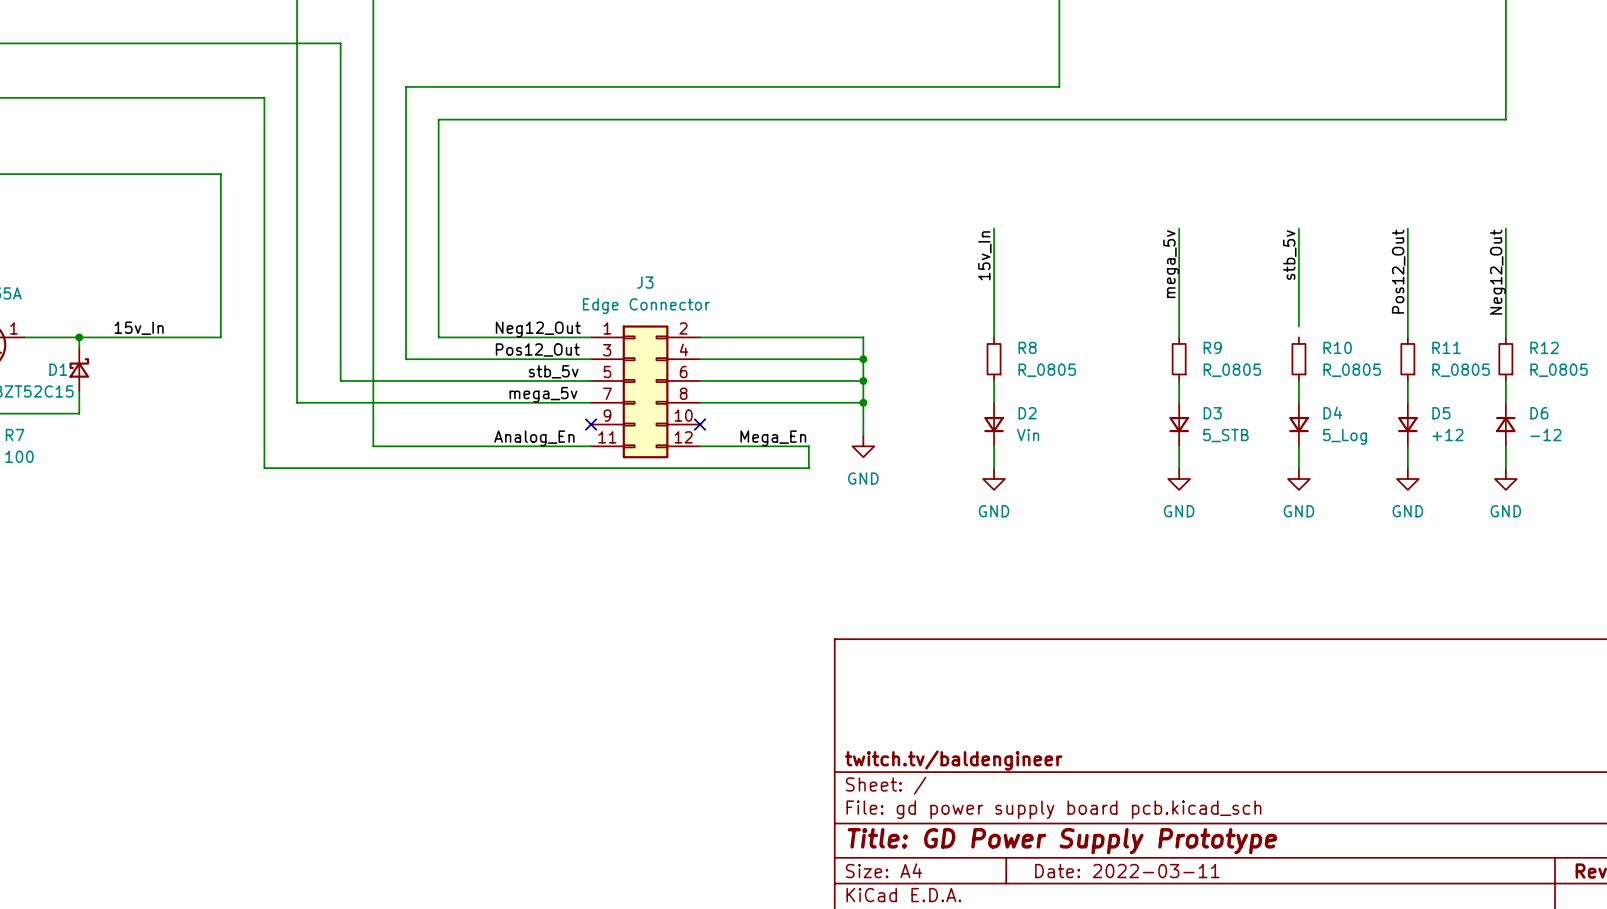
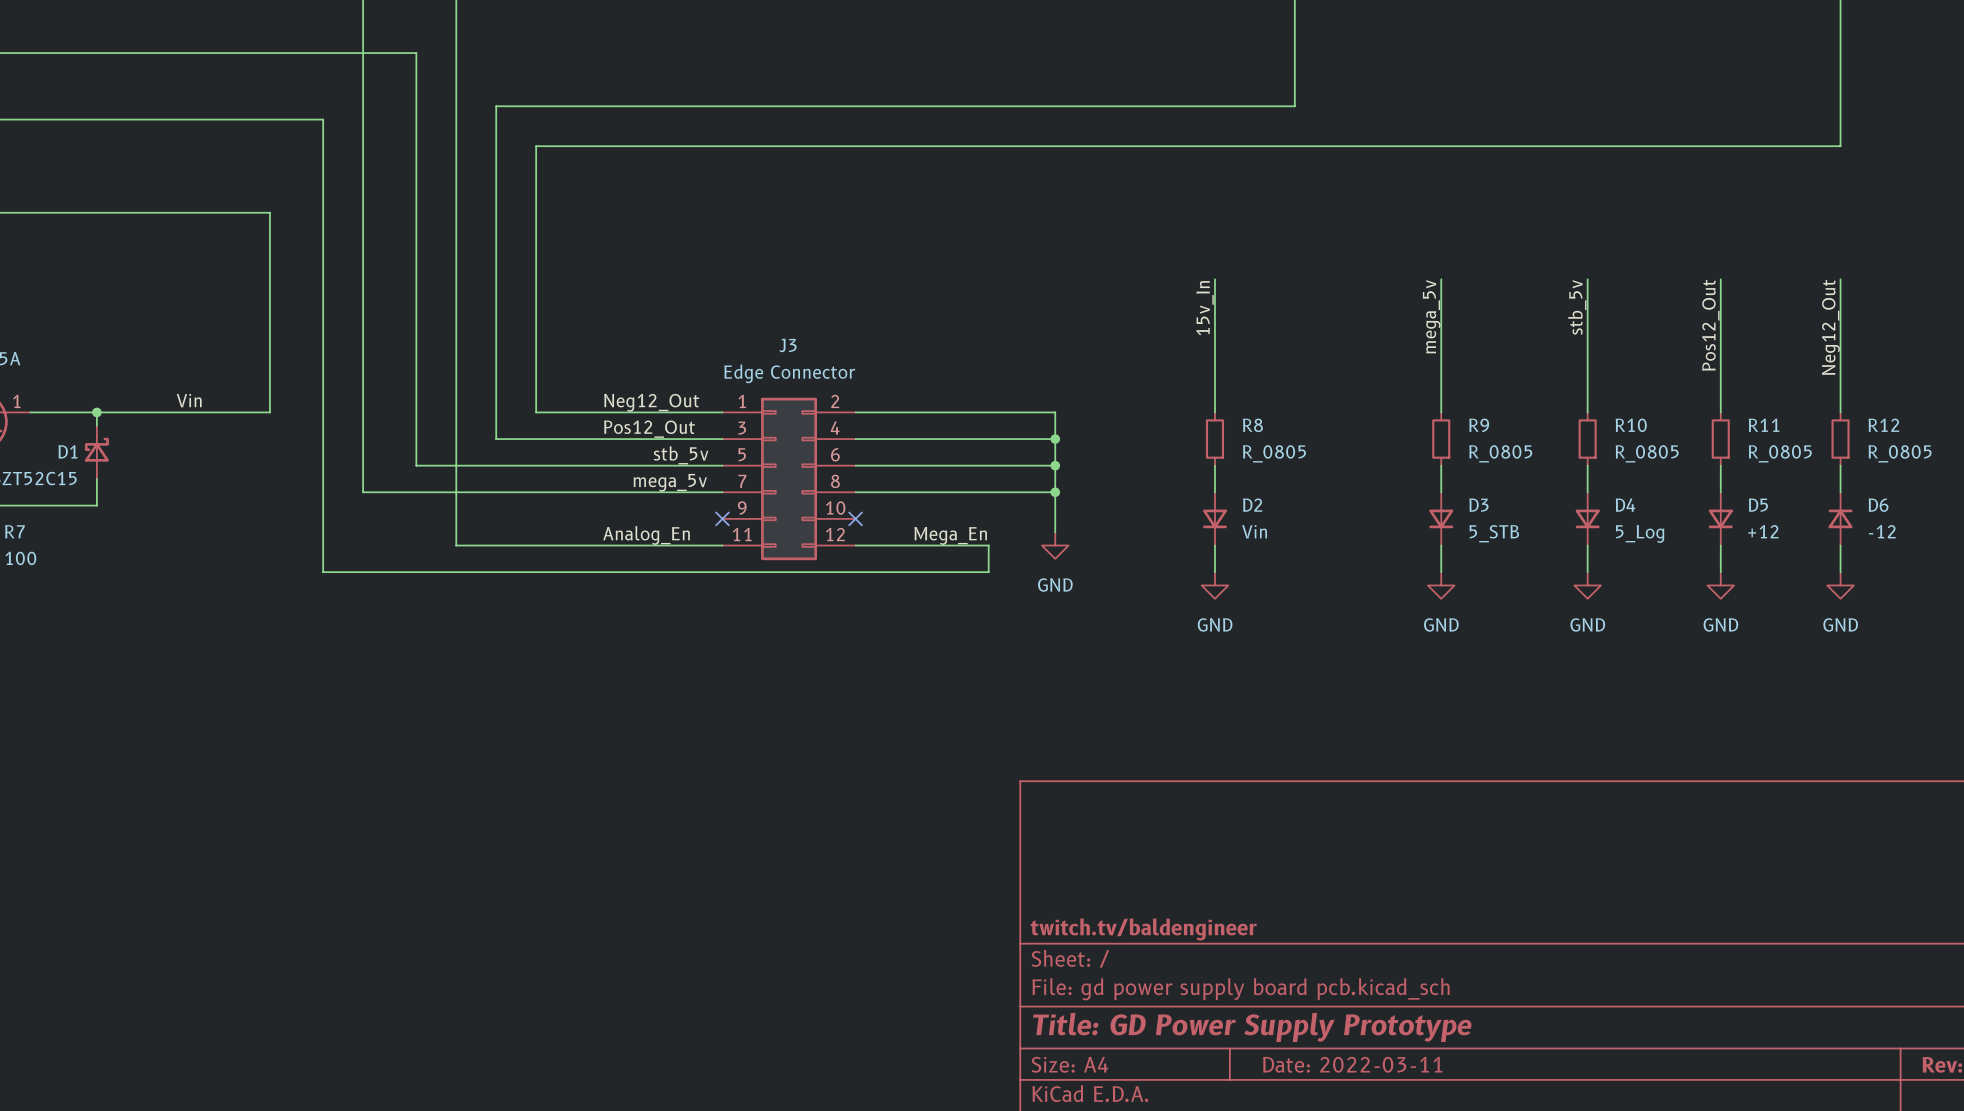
wire: none -> (1587, 399) (1587, 412)
label: 15v_In (139, 328) -> Vin (189, 400)

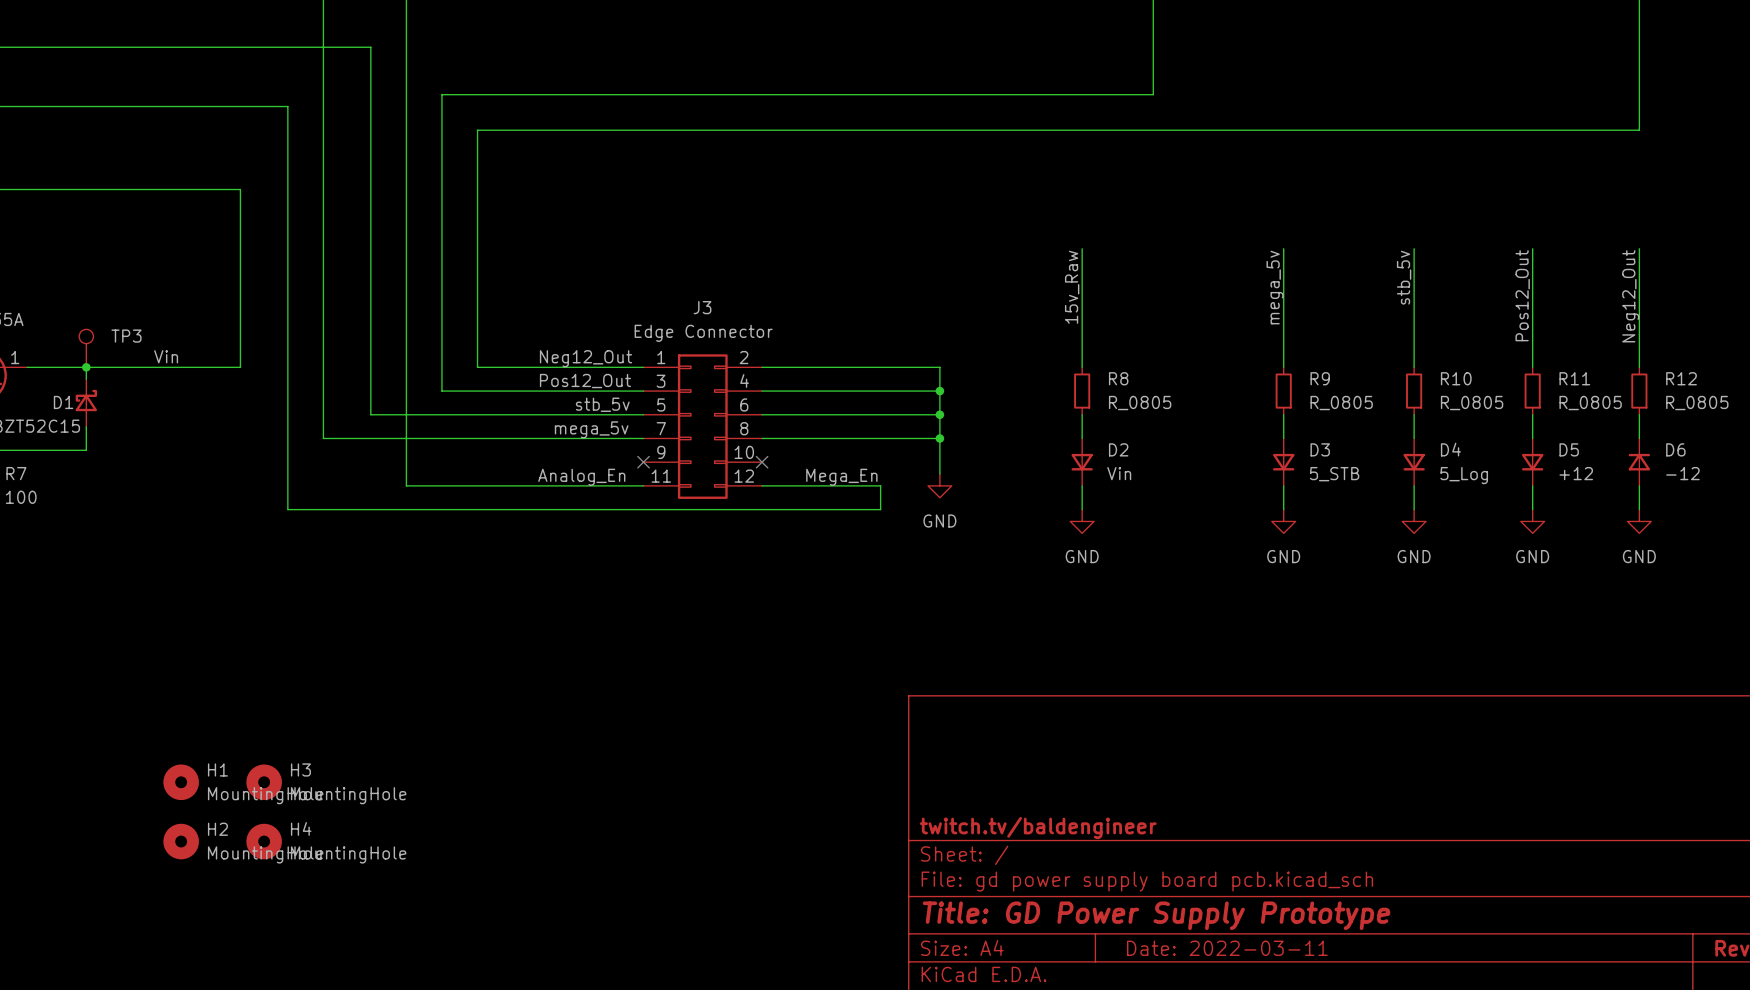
label: 15v_In (1205, 308) -> 15v_Raw (1072, 287)
TP3: none -> (86, 348)
H1: none -> MountingHole (181, 782)
H3: none -> MountingHole (264, 782)
H2: none -> MountingHole (181, 841)
H4: none -> MountingHole (264, 841)

